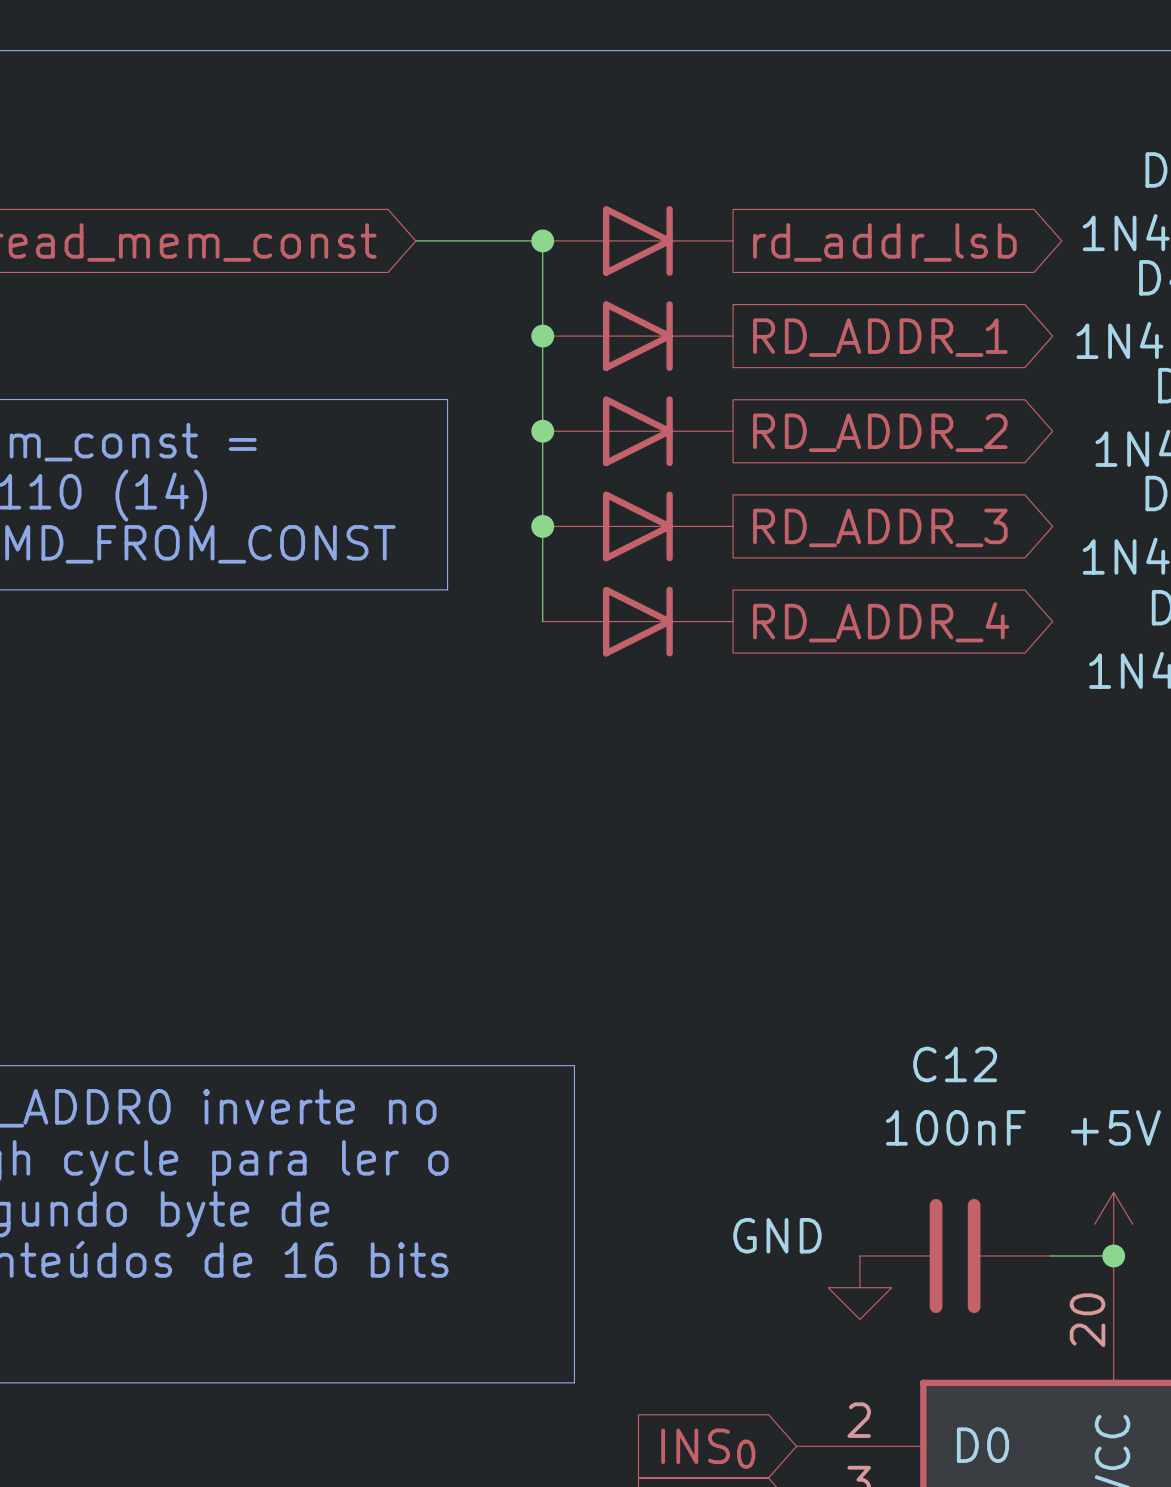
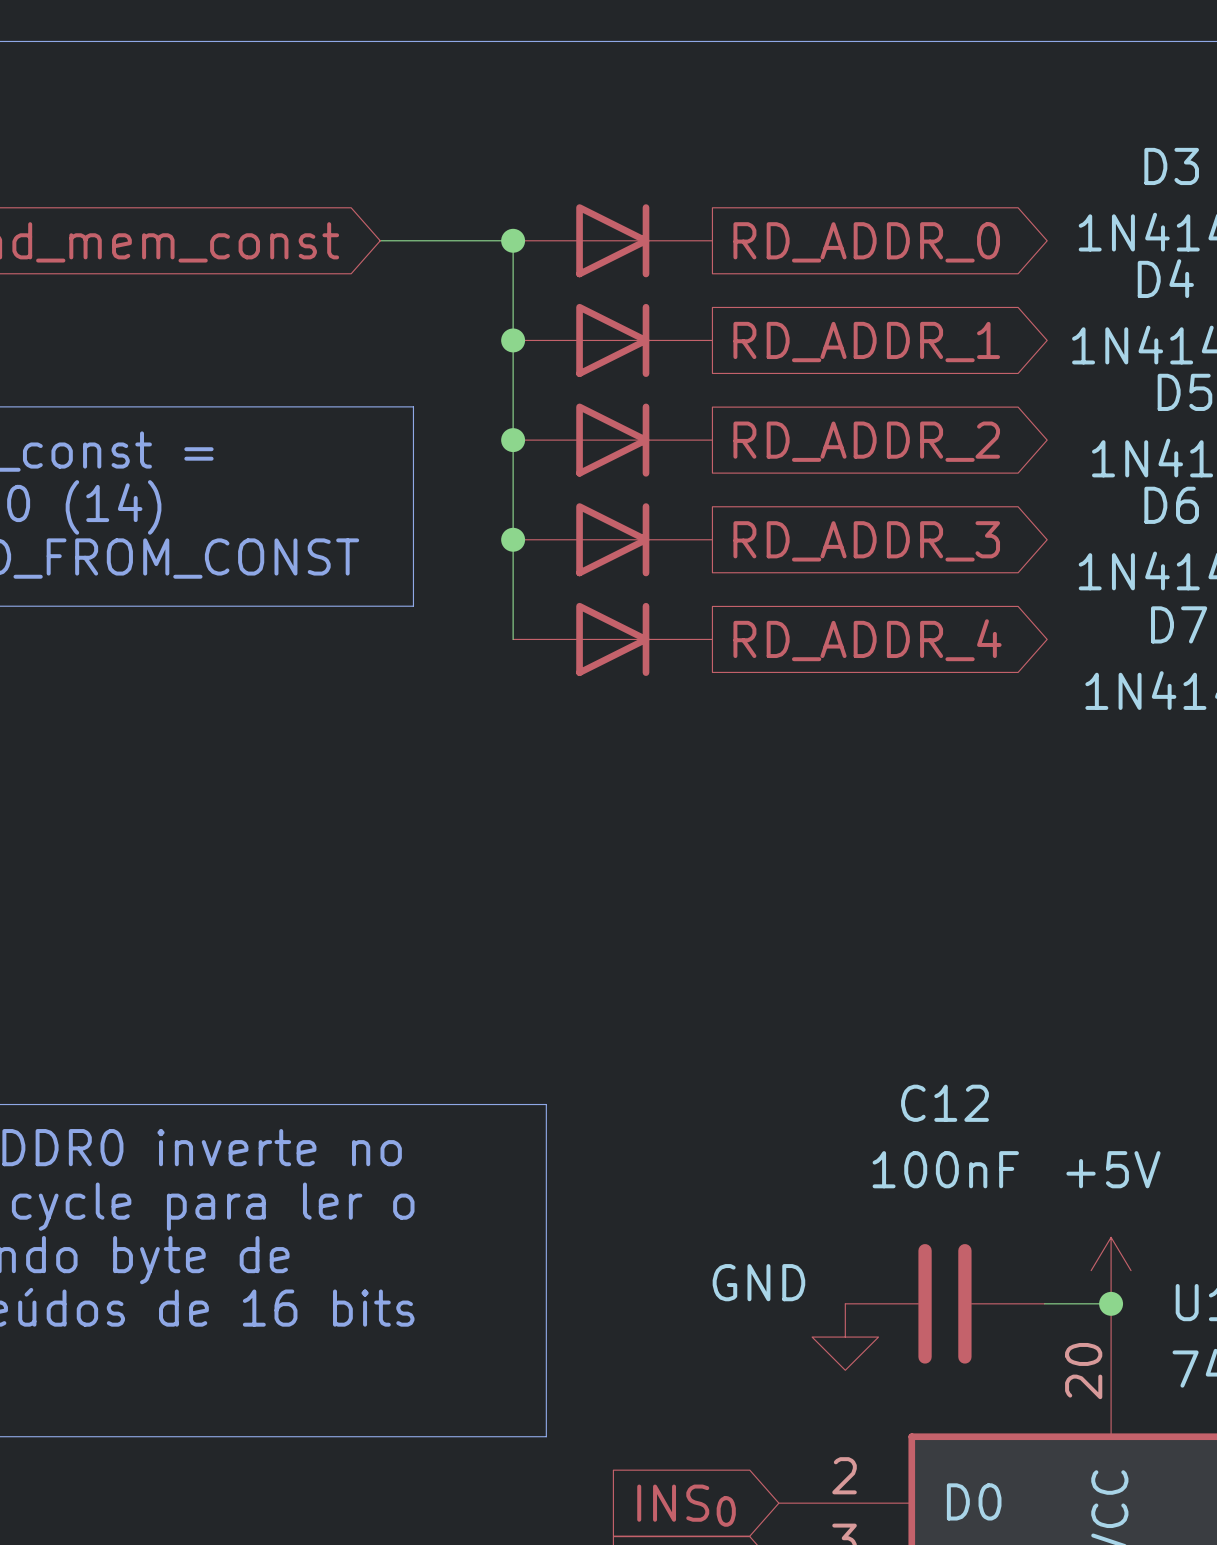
global label: rd_addr_lsb (884, 242) -> RD_ADDR_0 (866, 242)

